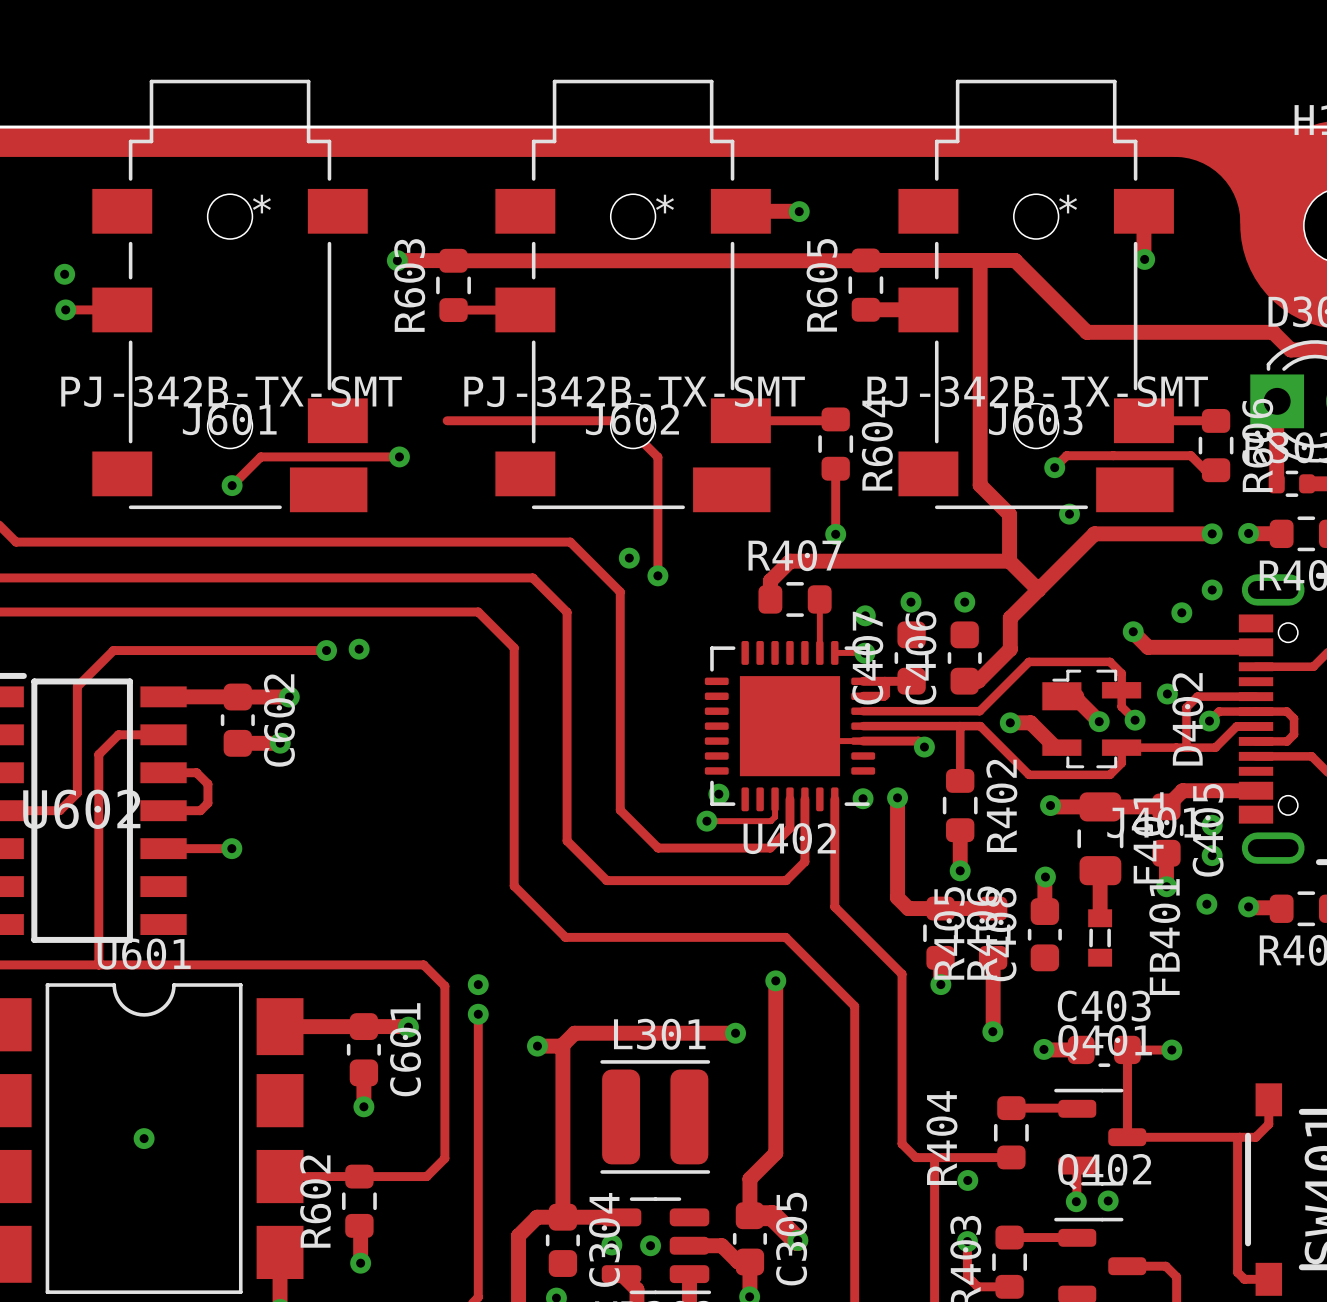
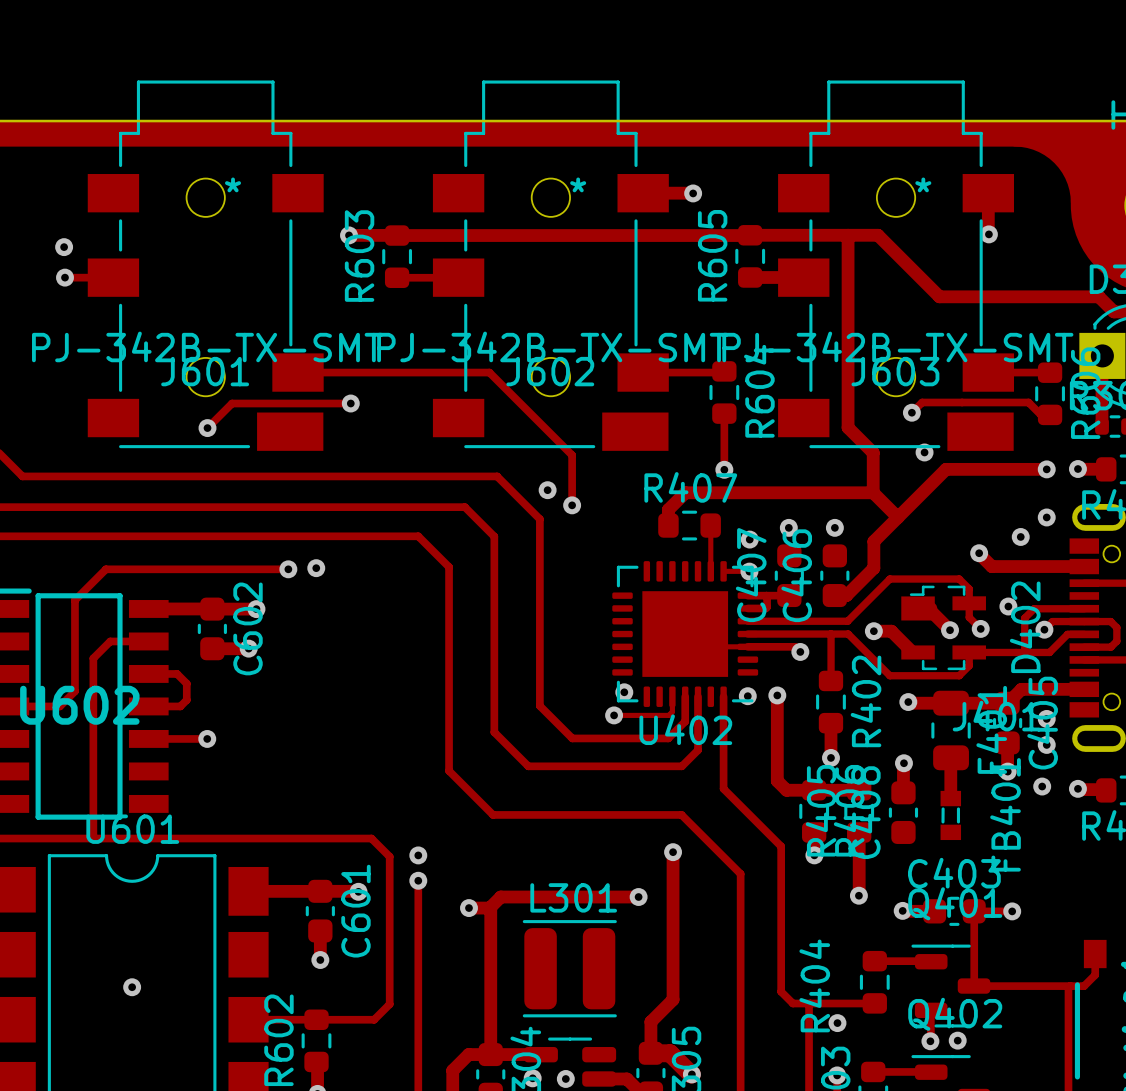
track: none -> (298, 372) (391, 372)
track: (561, 420) (621, 420) (657, 457) (657, 517) -> (489, 372) (572, 455)

